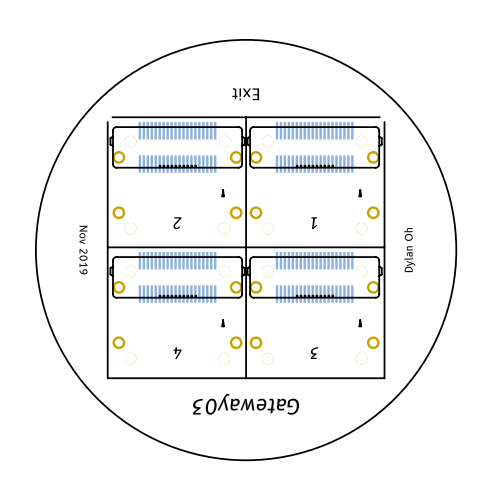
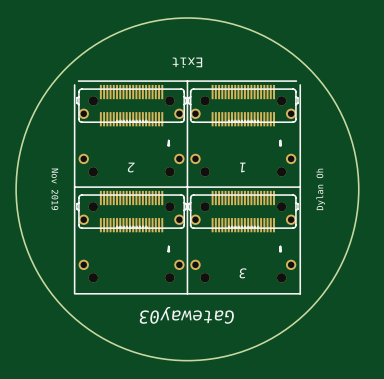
text: 4 (177, 353) -> none

